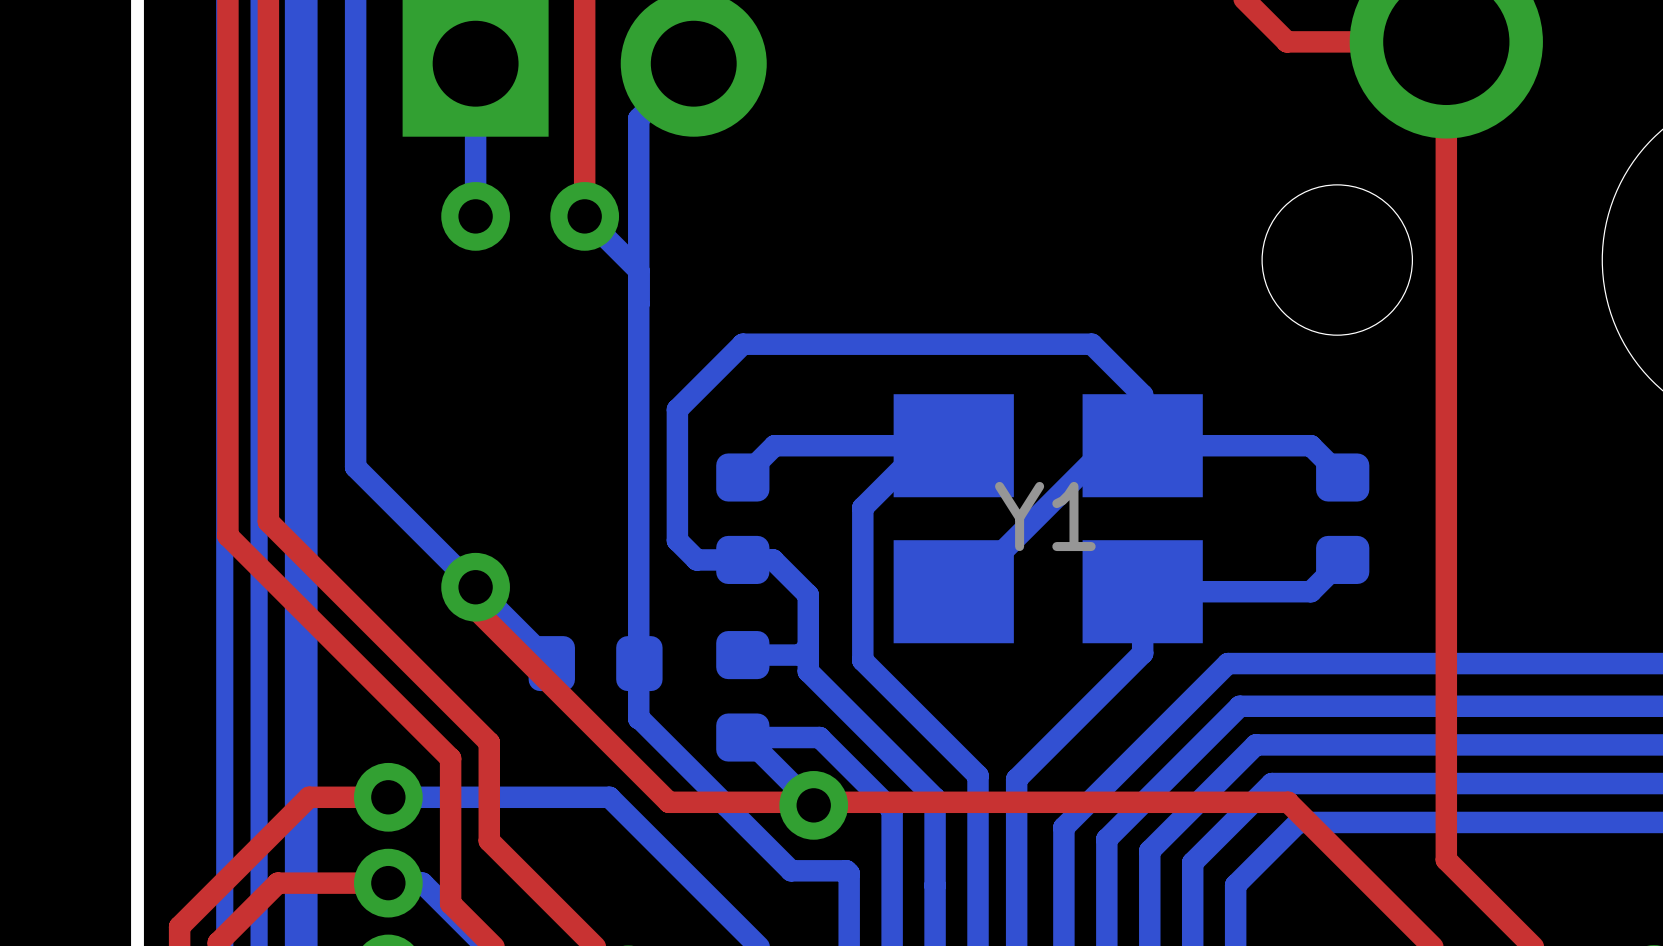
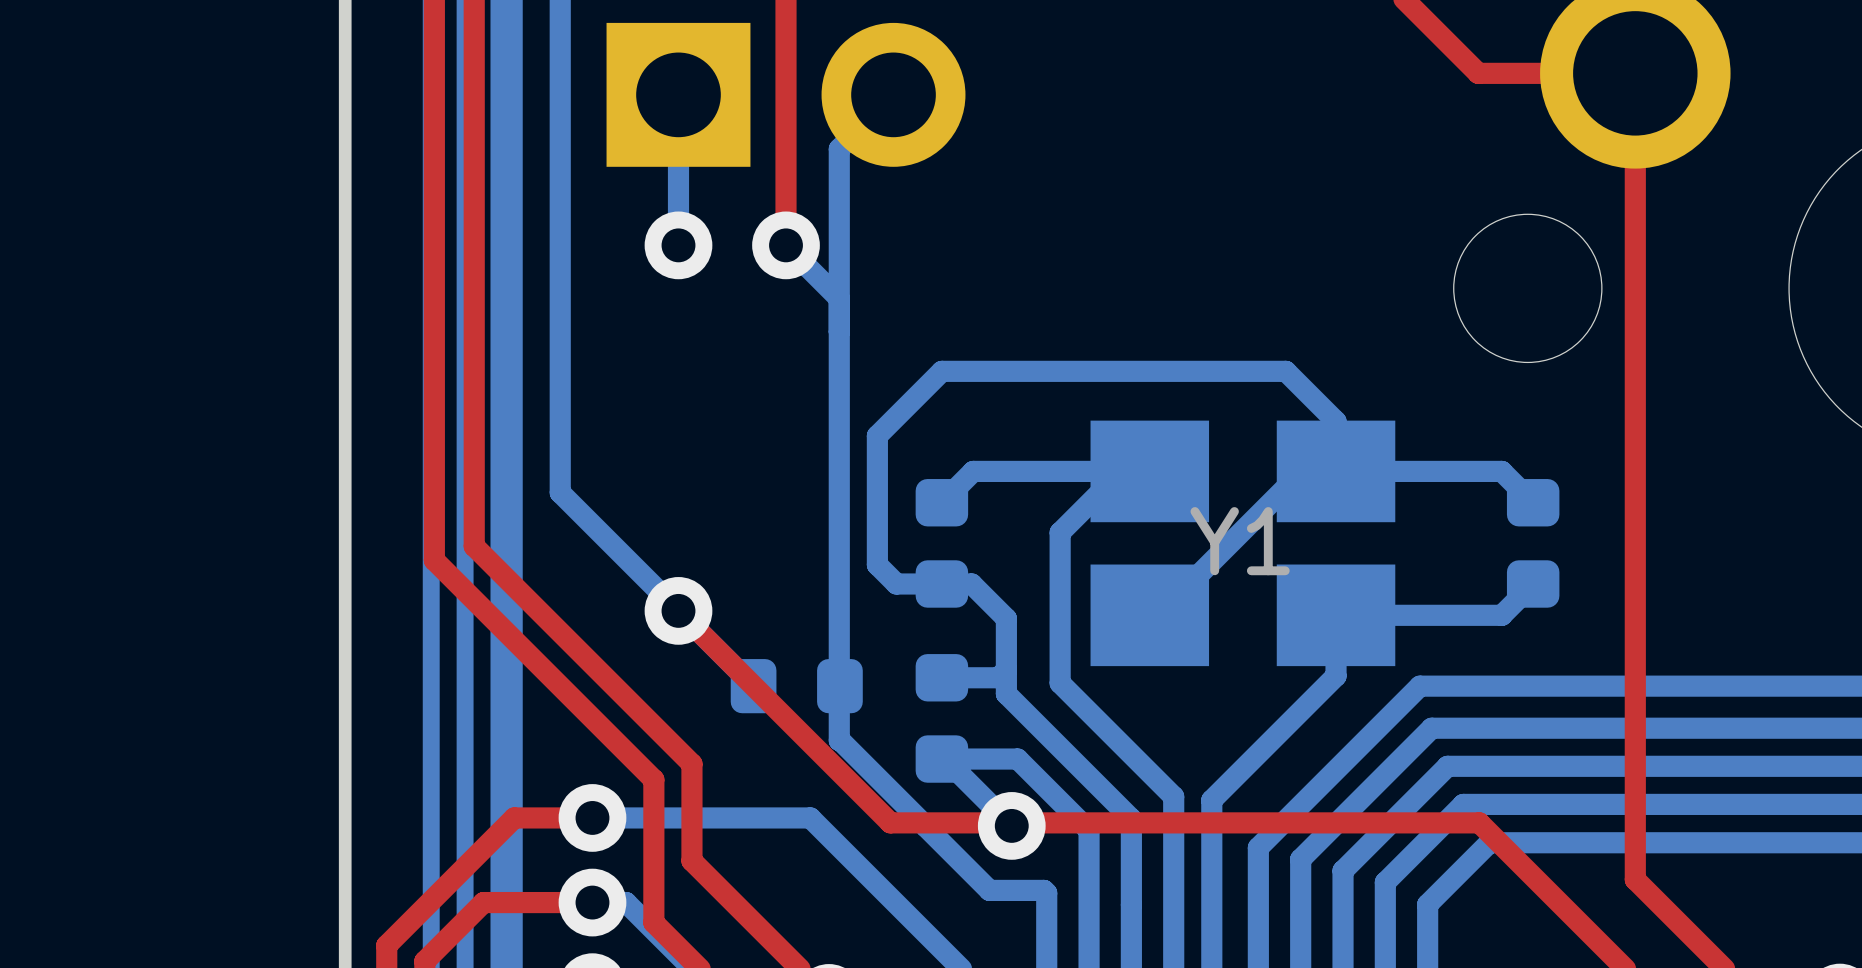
top track: (475, 587) (475, 609) (668, 802) (690, 802) -> (678, 610) (890, 822)

